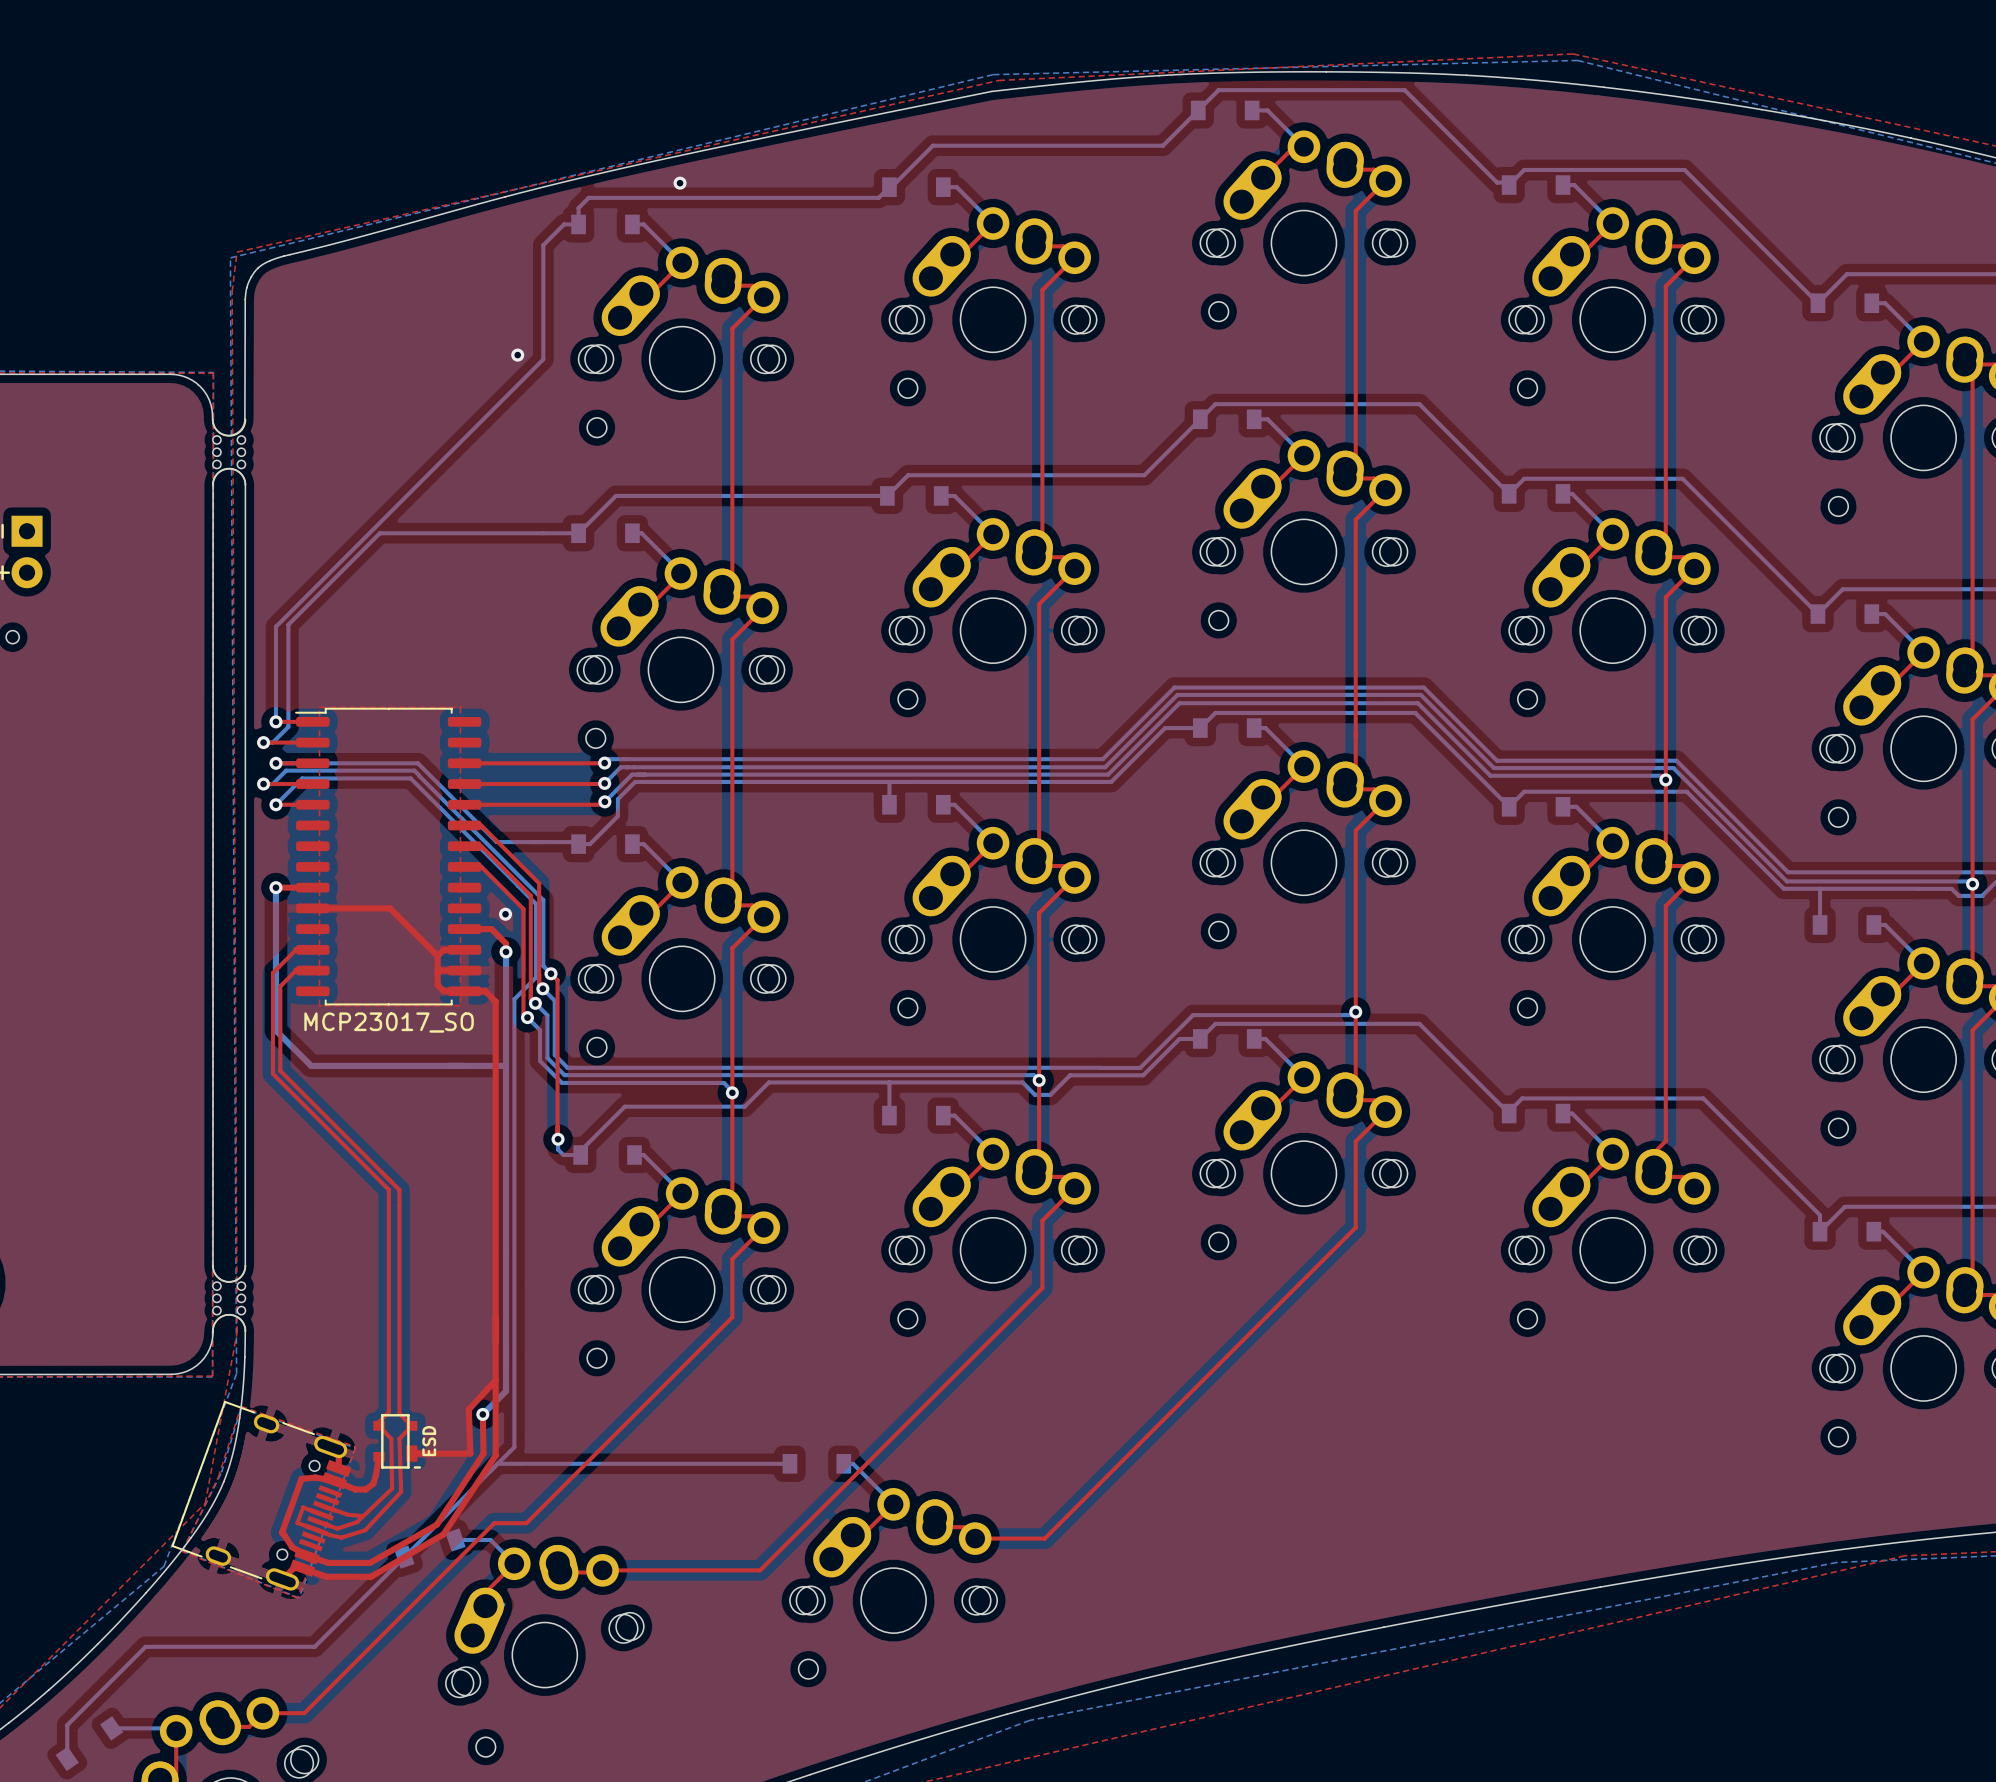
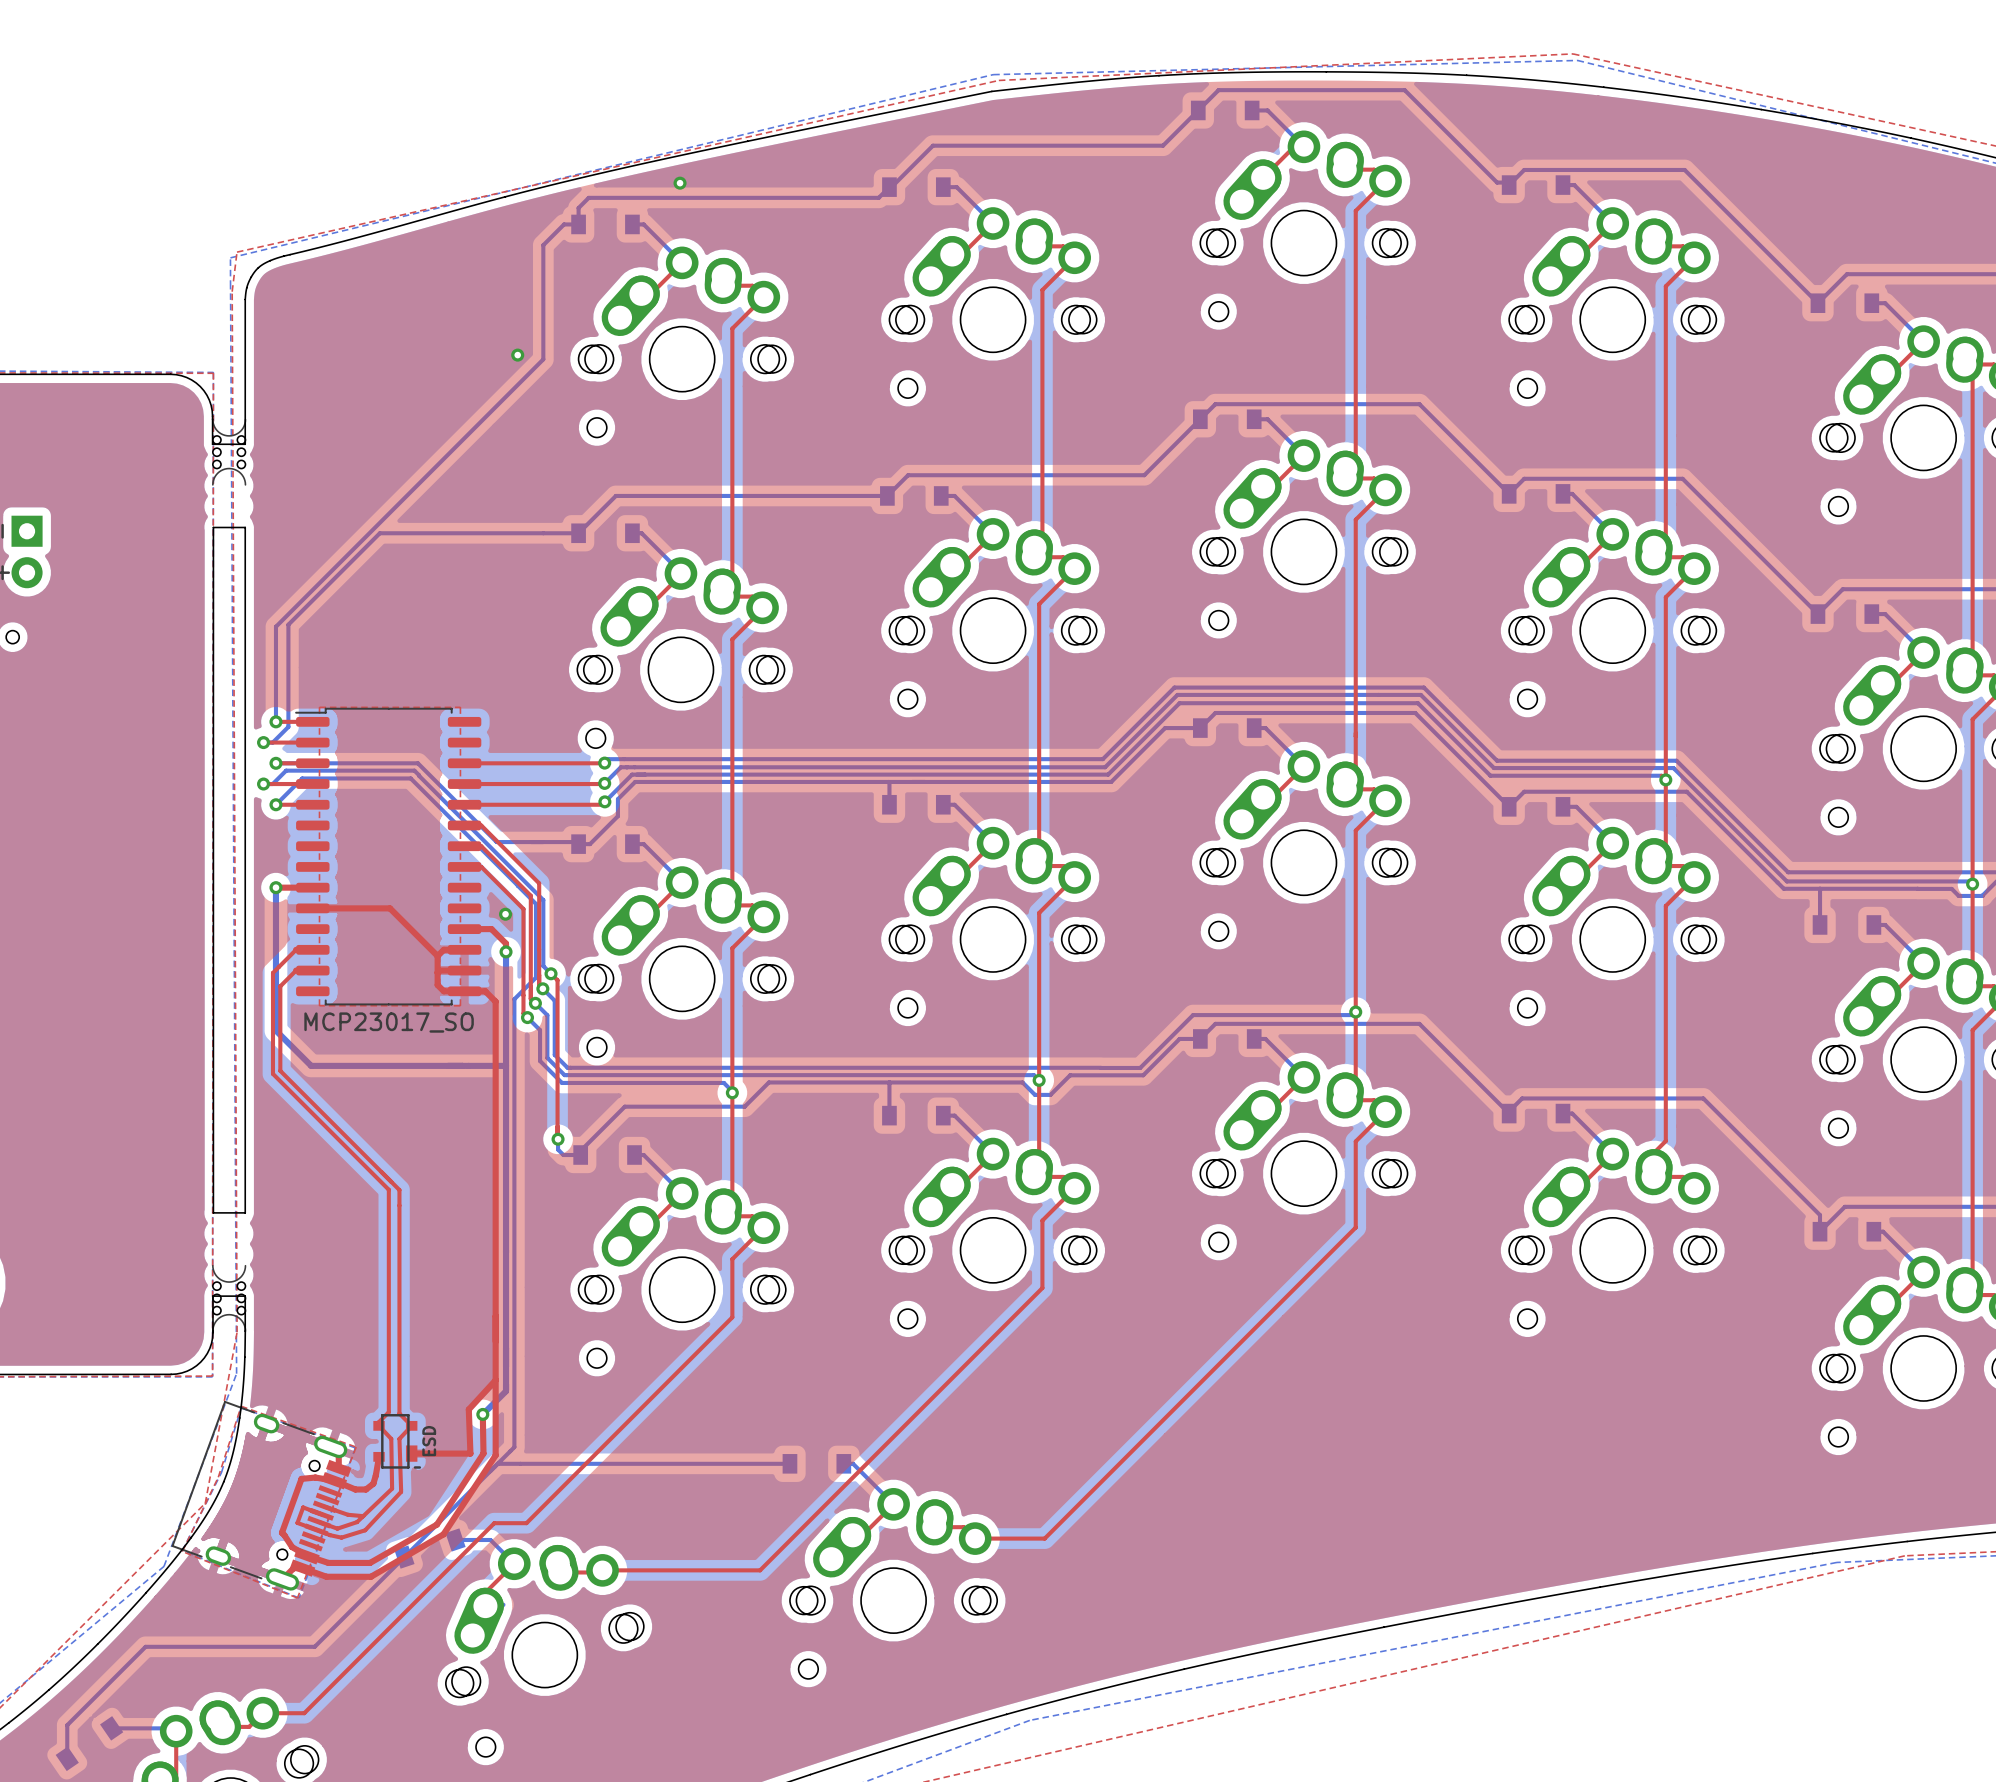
board edge: (245, 299) (244, 423) (238, 432) (226, 435) (215, 429) (212, 419) -> (245, 299) (245, 444) (212, 444) (212, 419)
board edge: (245, 1265) (245, 485) (240, 473) (229, 468) (217, 473) (213, 484) (212, 1265) (217, 1276) (229, 1281) (240, 1277) (245, 1265) -> (213, 527) (213, 1212) (245, 1212) (245, 527) (213, 527)
board edge: (212, 1331) (217, 1319) (229, 1314) (240, 1319) (245, 1331) -> (212, 1331) (212, 1296) (245, 1296) (245, 1331)

